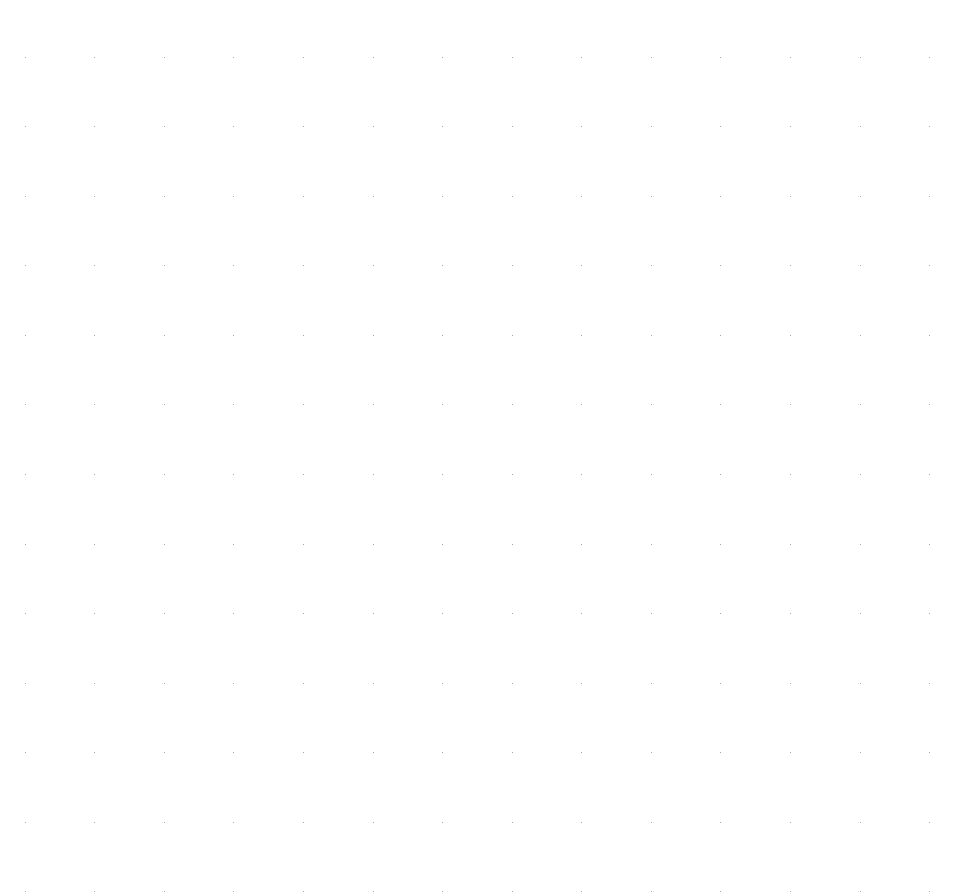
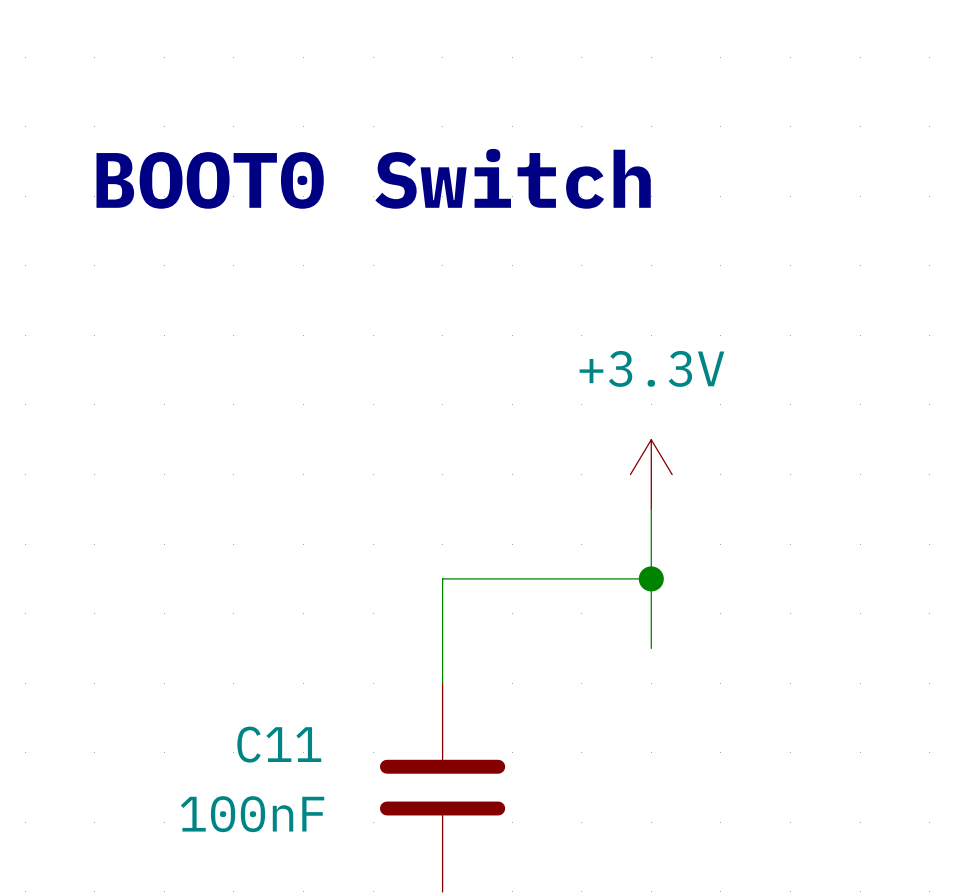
text: none -> BOOT0 Switch (373, 178)
power symbol: none -> +3.3V (651, 474)
wire: none -> (651, 509) (651, 648)
wire: none -> (651, 578) (442, 578) (442, 683)
junction: none -> (651, 578)
C11: none -> 100nF (442, 787)

